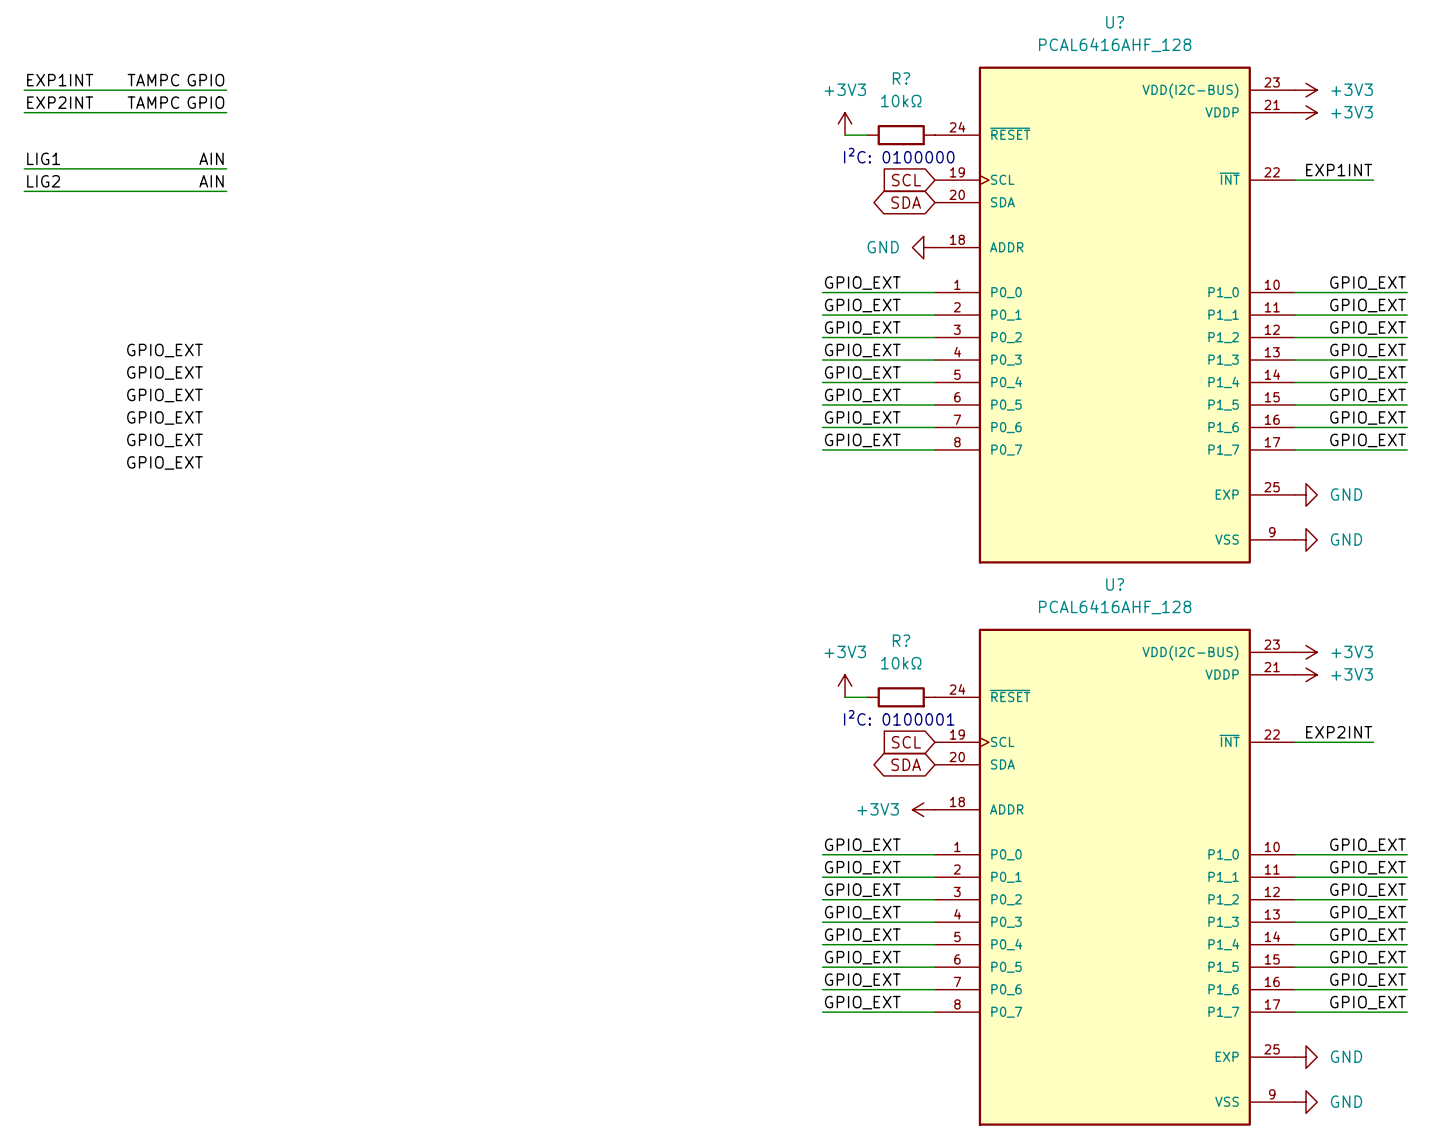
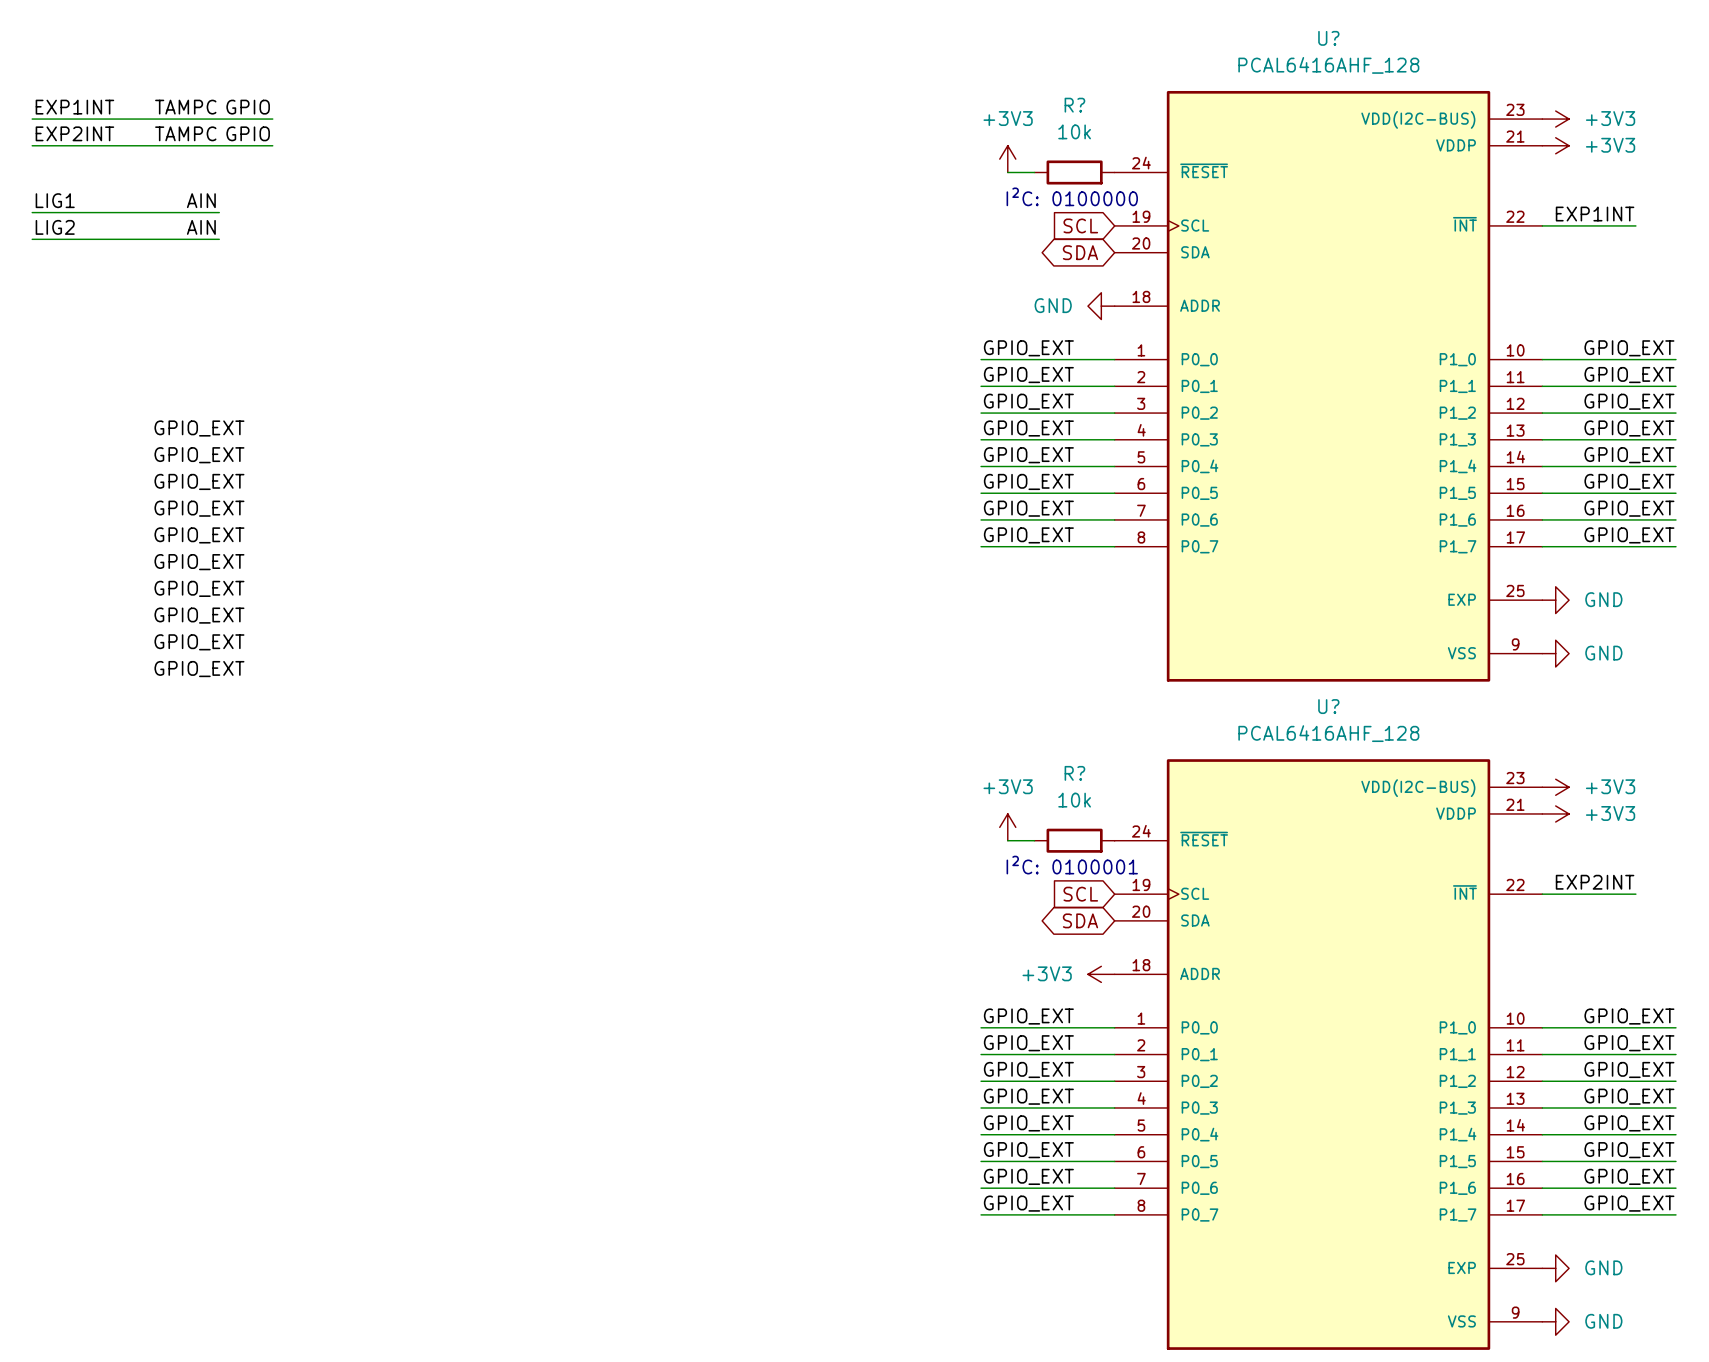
R? value: 10kΩ (901, 100) -> 10k (1074, 131)
label: none -> AIN (201, 200)
label: AIN (211, 158) -> none
wire: (181, 168) (226, 168) -> none
label: none -> AIN (201, 227)
label: AIN (211, 181) -> none
wire: (181, 191) (226, 191) -> none
label: none -> GPIO_EXT (199, 588)
label: none -> GPIO_EXT (199, 615)
label: none -> GPIO_EXT (199, 642)
label: none -> GPIO_EXT (199, 669)
R? value: 10kΩ (901, 663) -> 10k (1074, 800)

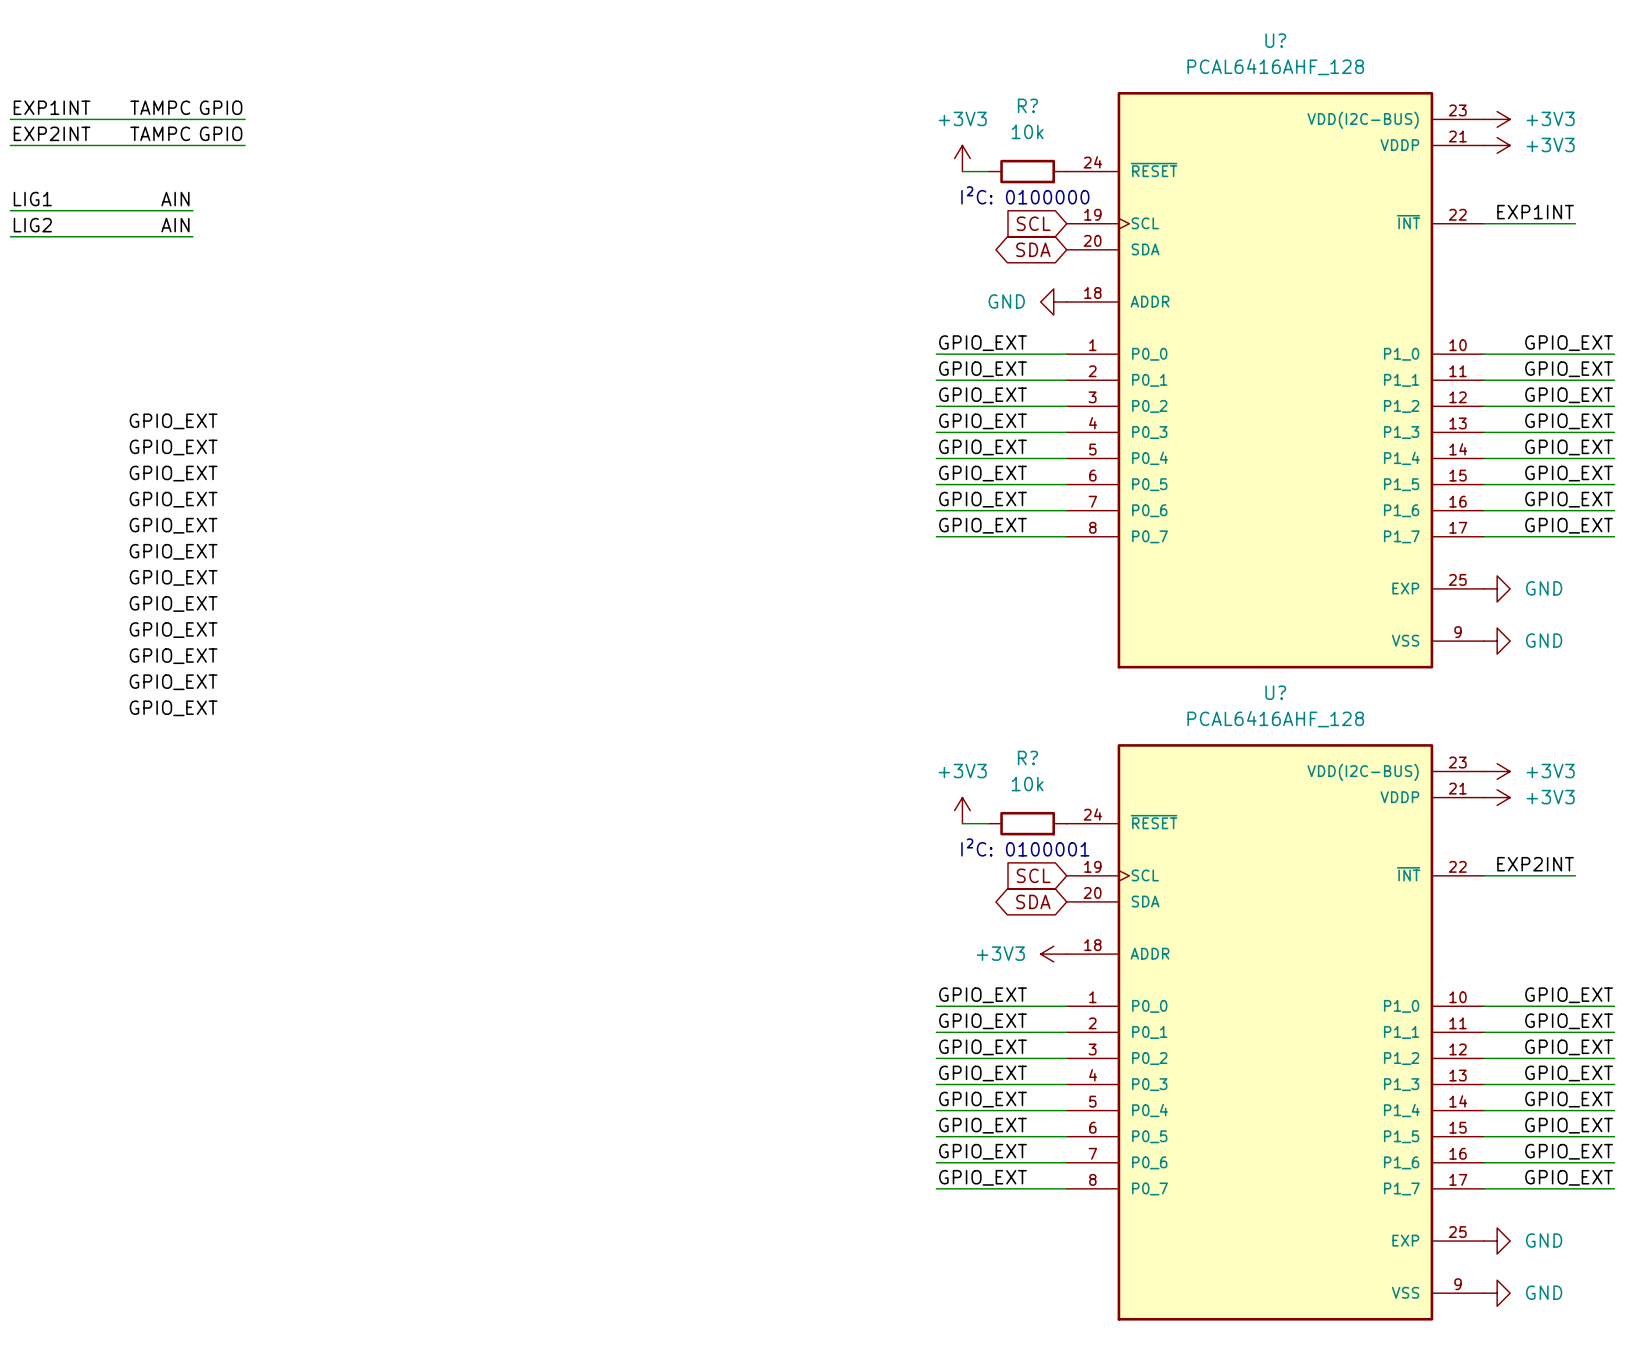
label: none -> GPIO_EXT (173, 682)
label: none -> GPIO_EXT (173, 708)

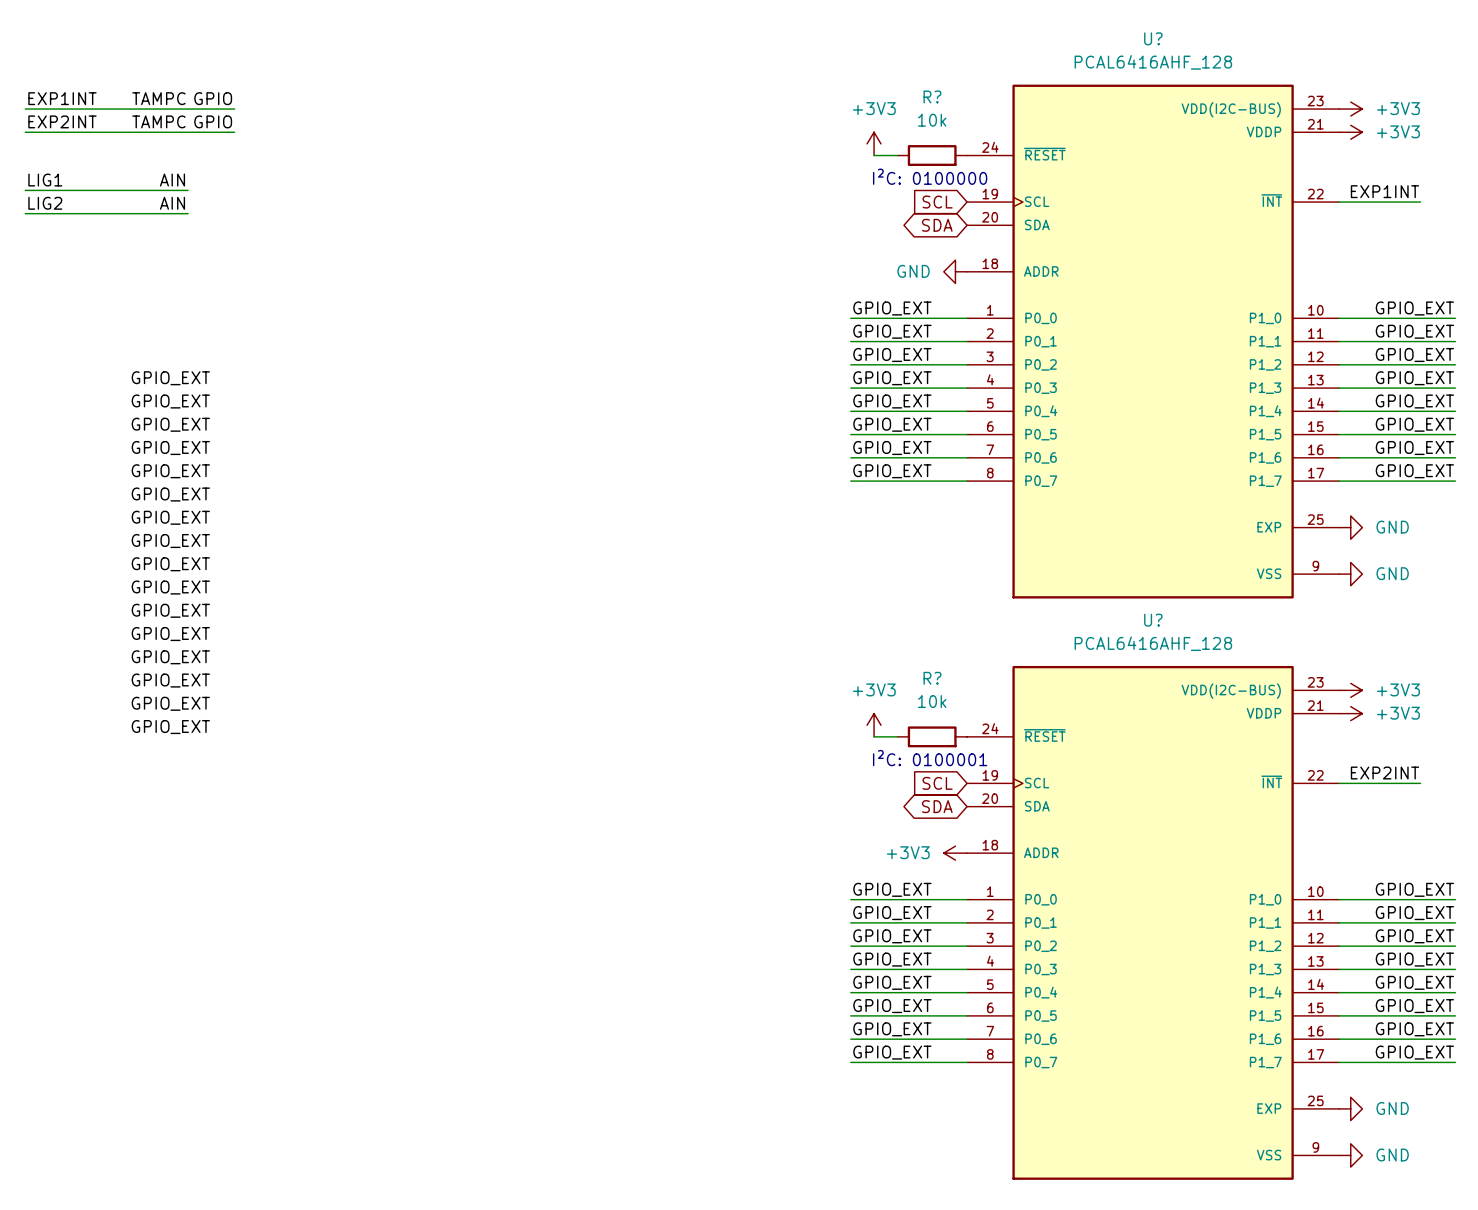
label: none -> GPIO_EXT (170, 657)
label: none -> GPIO_EXT (170, 680)
label: none -> GPIO_EXT (170, 703)
label: none -> GPIO_EXT (170, 727)

